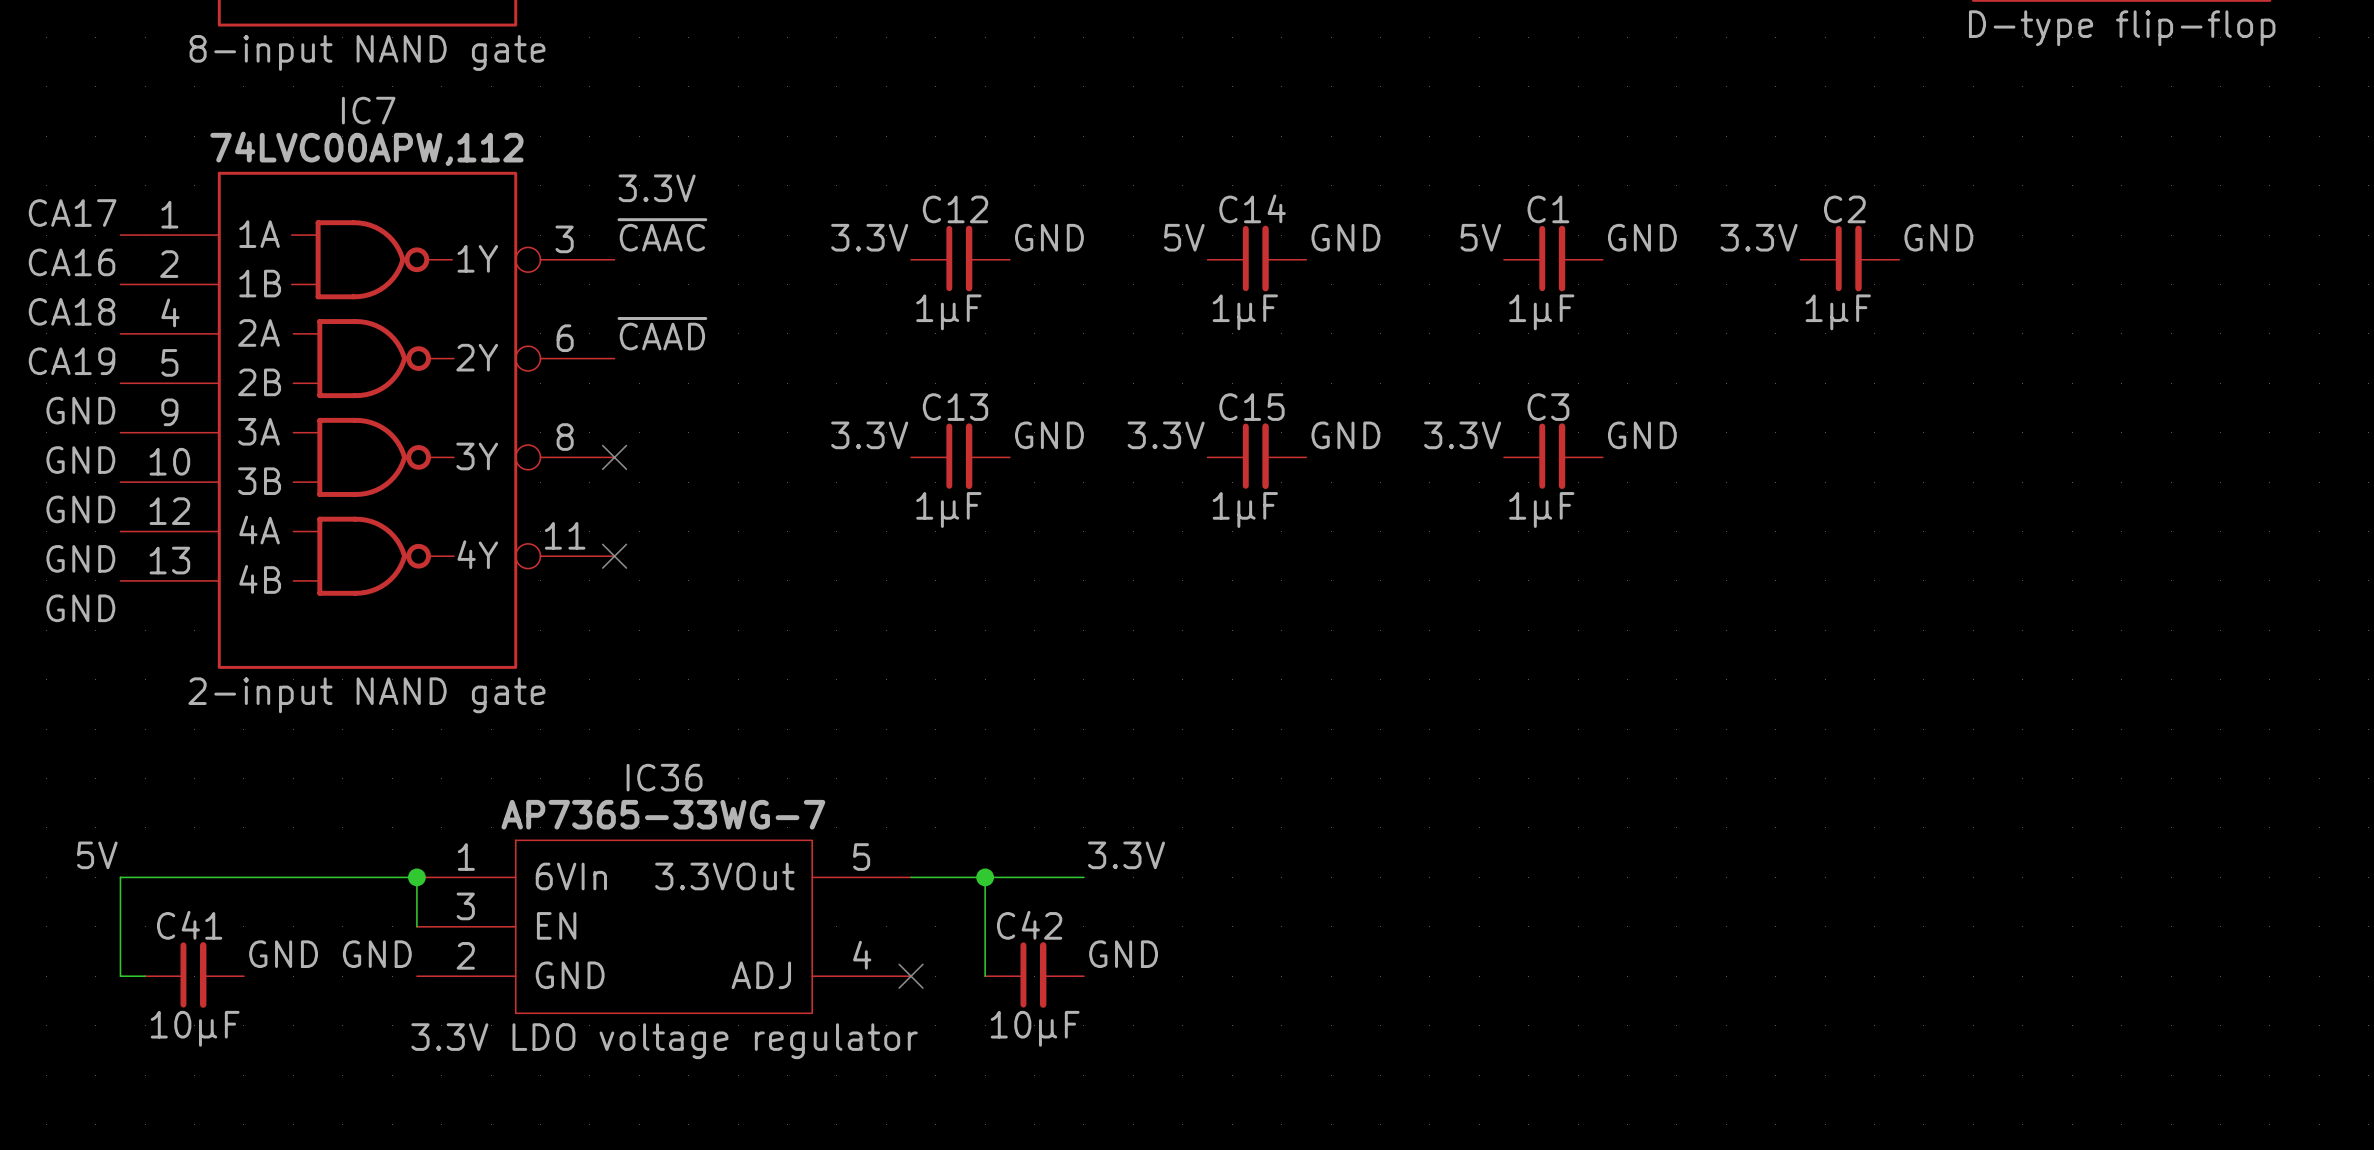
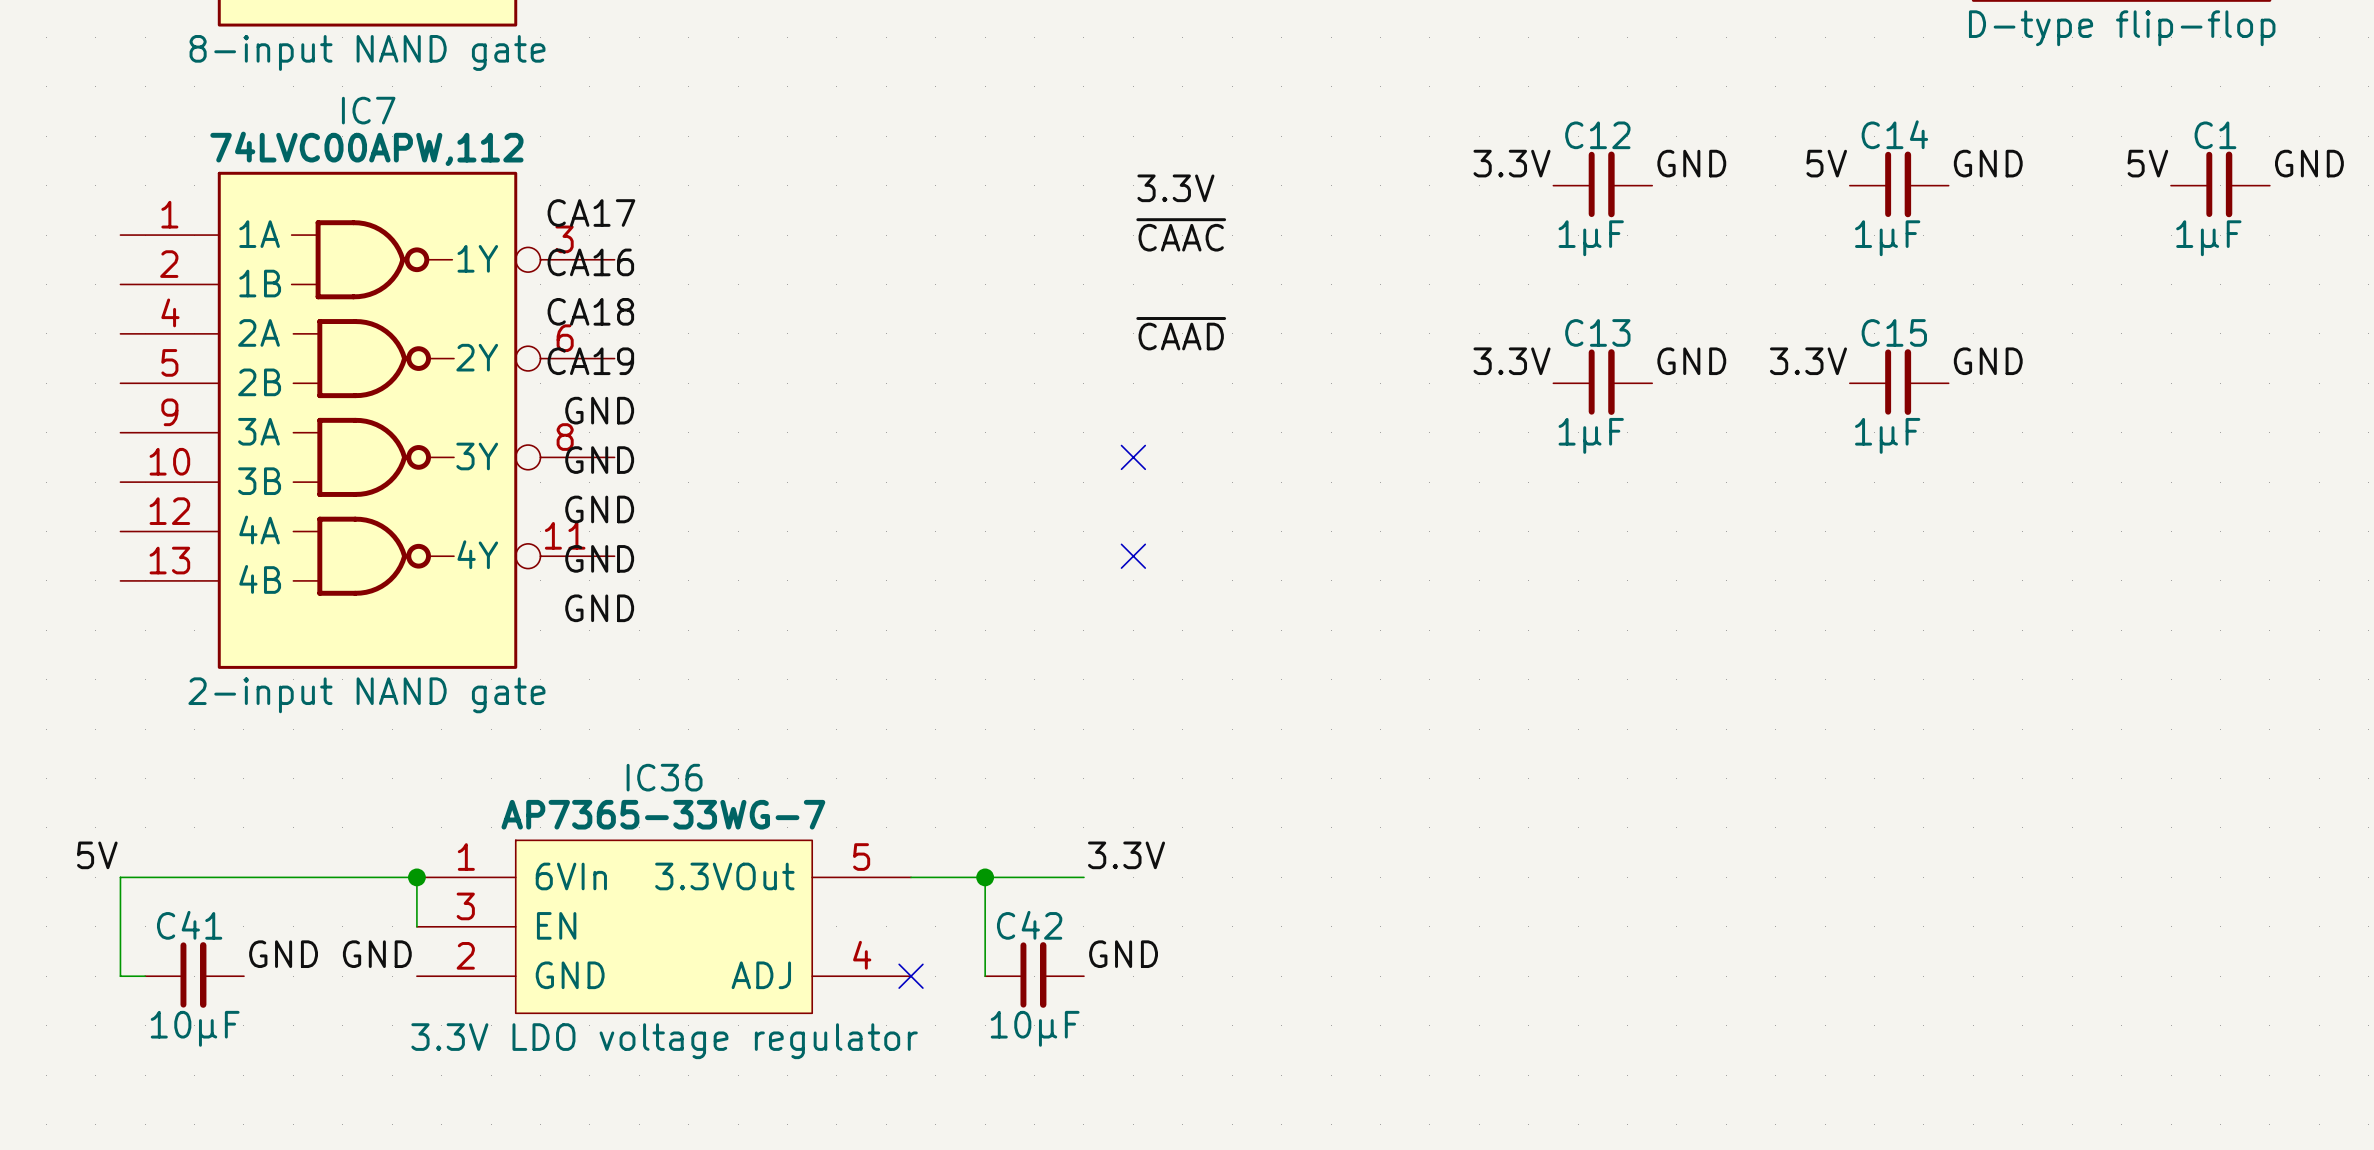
label: none -> 3.3V (1512, 163)
label: none -> GND (1691, 163)
label: none -> 5V (1826, 163)
label: none -> GND (1988, 163)
label: none -> 5V (2147, 163)
label: none -> GND (2309, 163)
label: 3.3V (657, 188) -> none
label: none -> 3.3V (1175, 188)
label: CA17 (72, 213) -> none
label: none -> CA17 (591, 213)
label: ~{CAAC} (662, 234) -> none
label: none -> ~{CAAC} (1181, 234)
label: 3.3V (869, 237) -> none
label: GND (1049, 237) -> none
label: 5V (1184, 237) -> none
label: GND (1345, 237) -> none
label: 5V (1480, 237) -> none
label: GND (1642, 237) -> none
label: 3.3V (1759, 237) -> none
label: GND (1938, 237) -> none
C12 position: (960, 258) -> (1602, 184)
C14 position: (1256, 258) -> (1899, 184)
C1 position: (1553, 258) -> (2220, 184)
C2: 1µF (1849, 258) -> none
label: CA16 (72, 262) -> none
label: none -> CA16 (590, 262)
label: CA18 (72, 311) -> none
label: none -> CA18 (590, 311)
label: ~{CAAD} (662, 333) -> none
label: none -> ~{CAAD} (1181, 333)
label: CA19 (72, 361) -> none
label: none -> CA19 (590, 361)
label: none -> GND (1691, 361)
label: none -> 3.3V (1808, 361)
label: none -> GND (1988, 361)
label: GND (80, 410) -> none
label: none -> GND (599, 410)
label: 3.3V (869, 435) -> none
label: GND (1049, 435) -> none
label: 3.3V (1166, 435) -> none
label: GND (1345, 435) -> none
label position: 3.3V (1462, 435) -> 3.3V (1512, 361)
label: GND (1642, 435) -> none
C13 position: (960, 456) -> (1602, 382)
C15 position: (1256, 456) -> (1899, 382)
C3: 1µF (1553, 456) -> none
no-connect mark: (614, 457) -> none
no-connect mark: none -> (1133, 457)
label: GND (80, 460) -> none
label: none -> GND (599, 460)
label: GND (80, 509) -> none
label: none -> GND (599, 509)
no-connect mark: (614, 556) -> none
no-connect mark: none -> (1133, 556)
label: GND (80, 558) -> none
label: none -> GND (599, 558)
label: GND (80, 608) -> none
label: none -> GND (599, 608)

